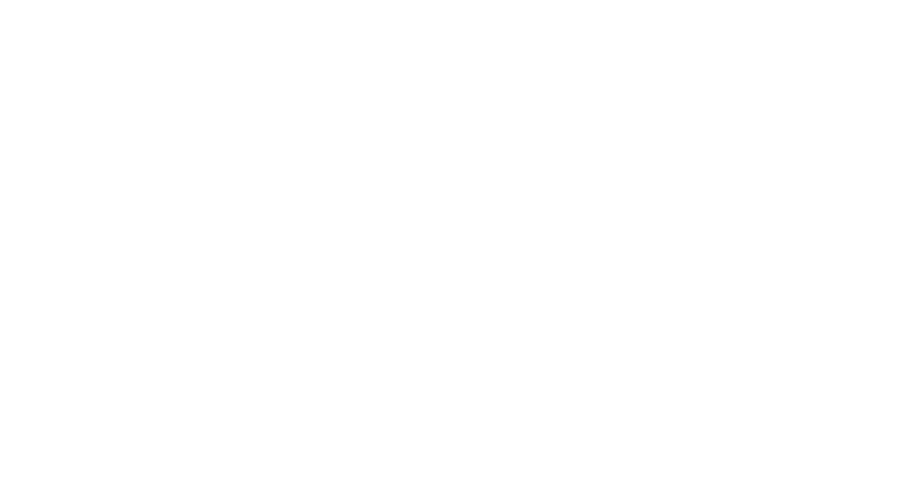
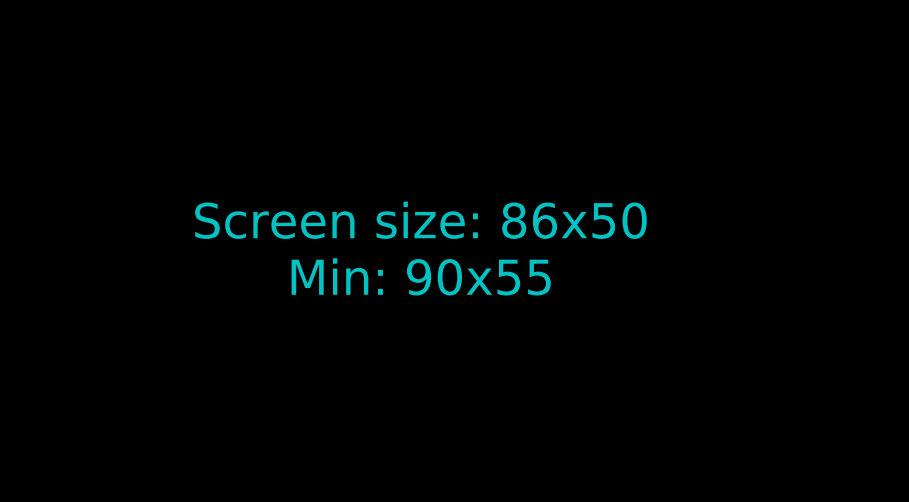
text: none -> Screen size: 86x50 (420, 220)
text: none -> Min: 90x55 (421, 276)

